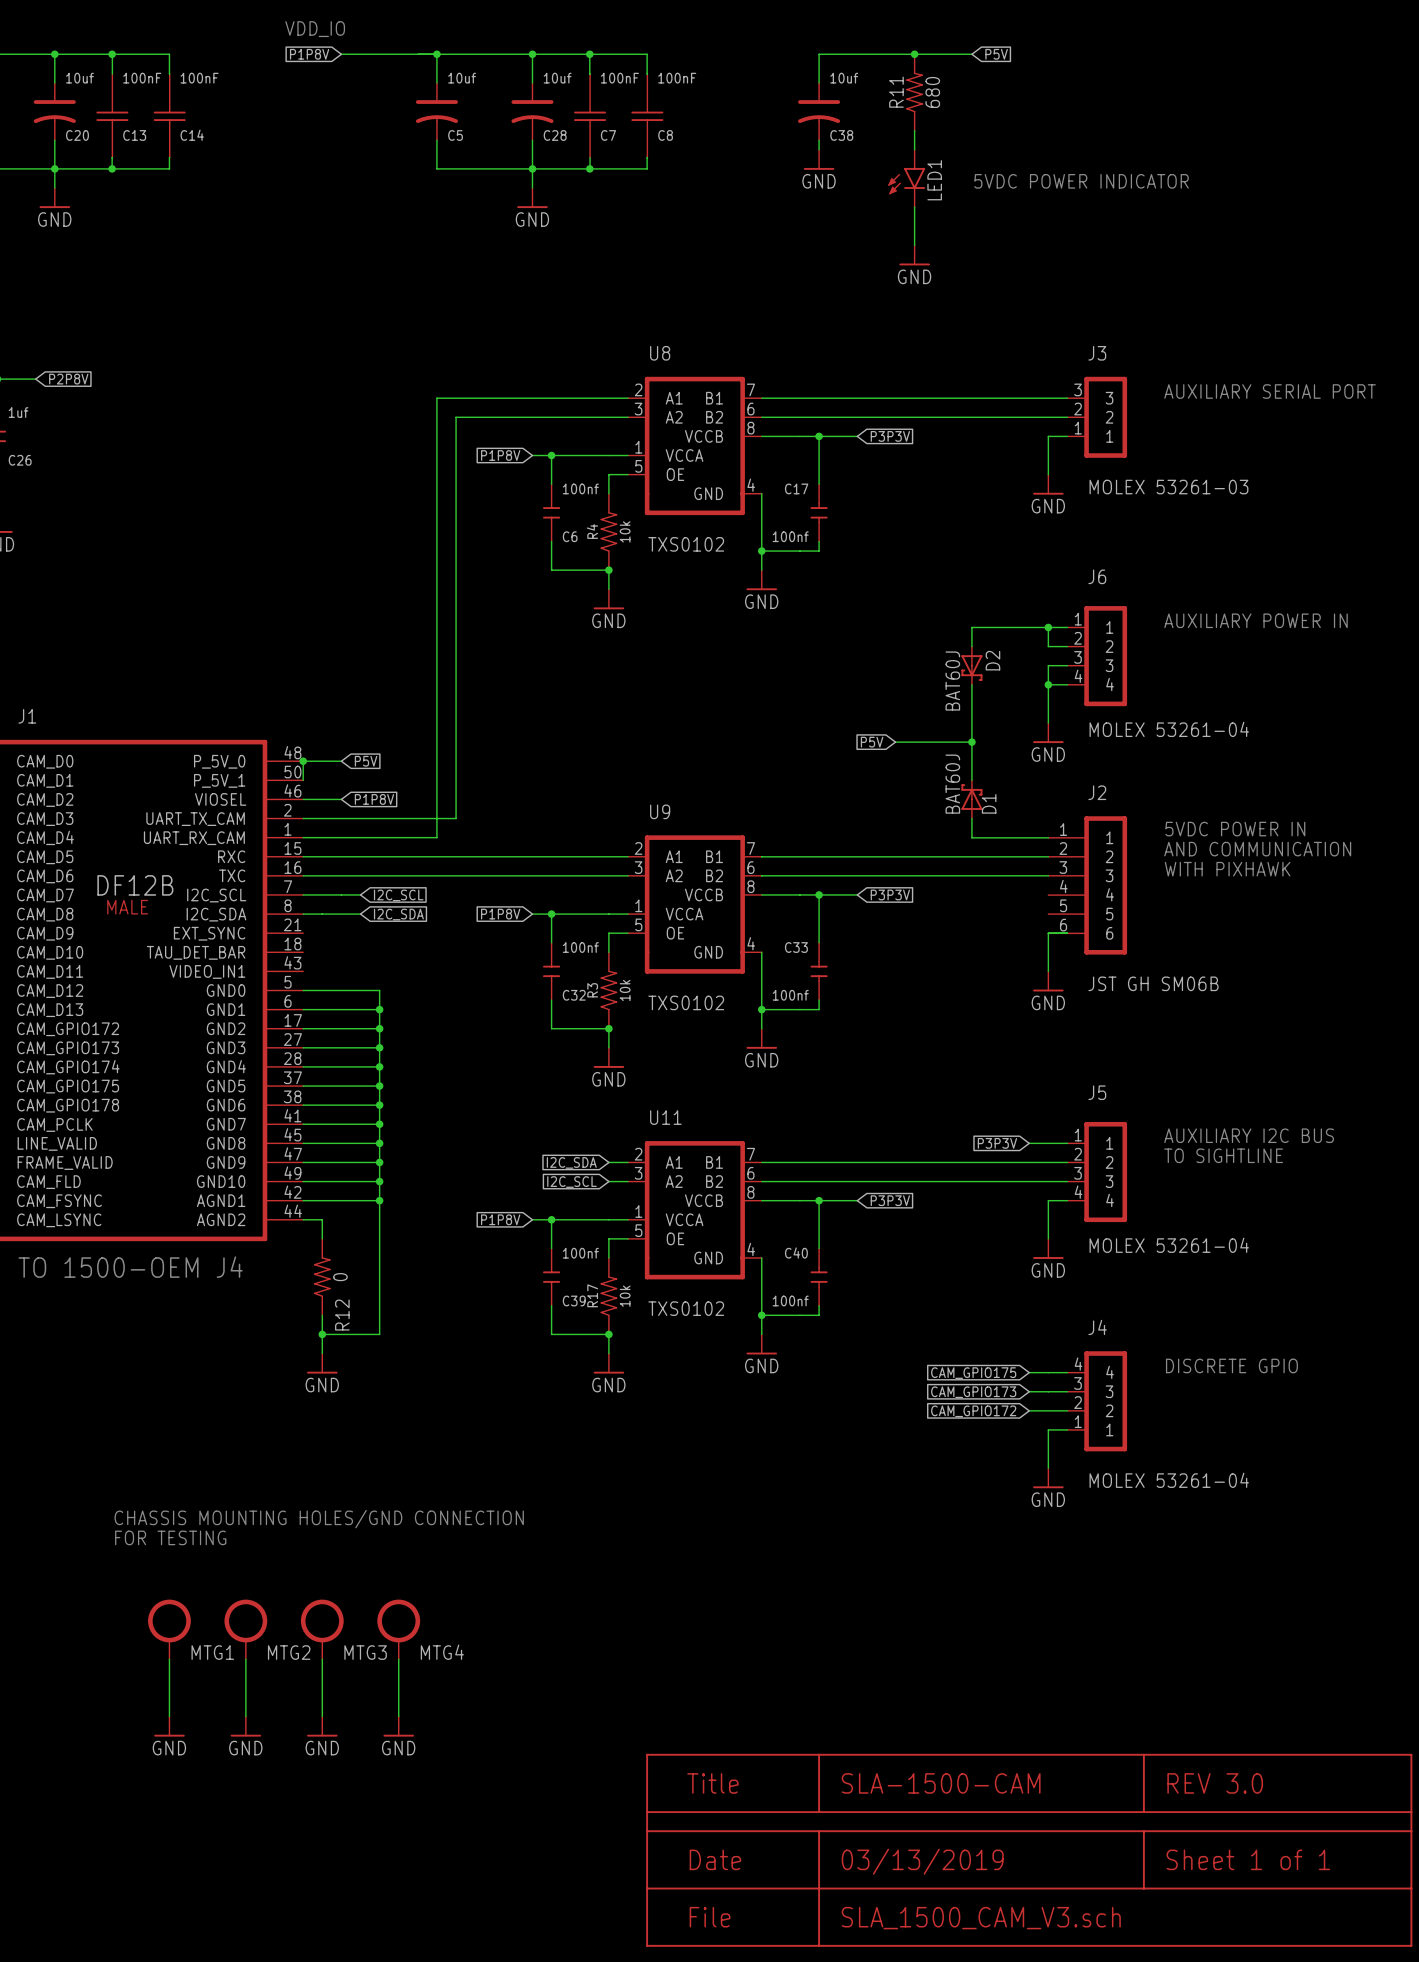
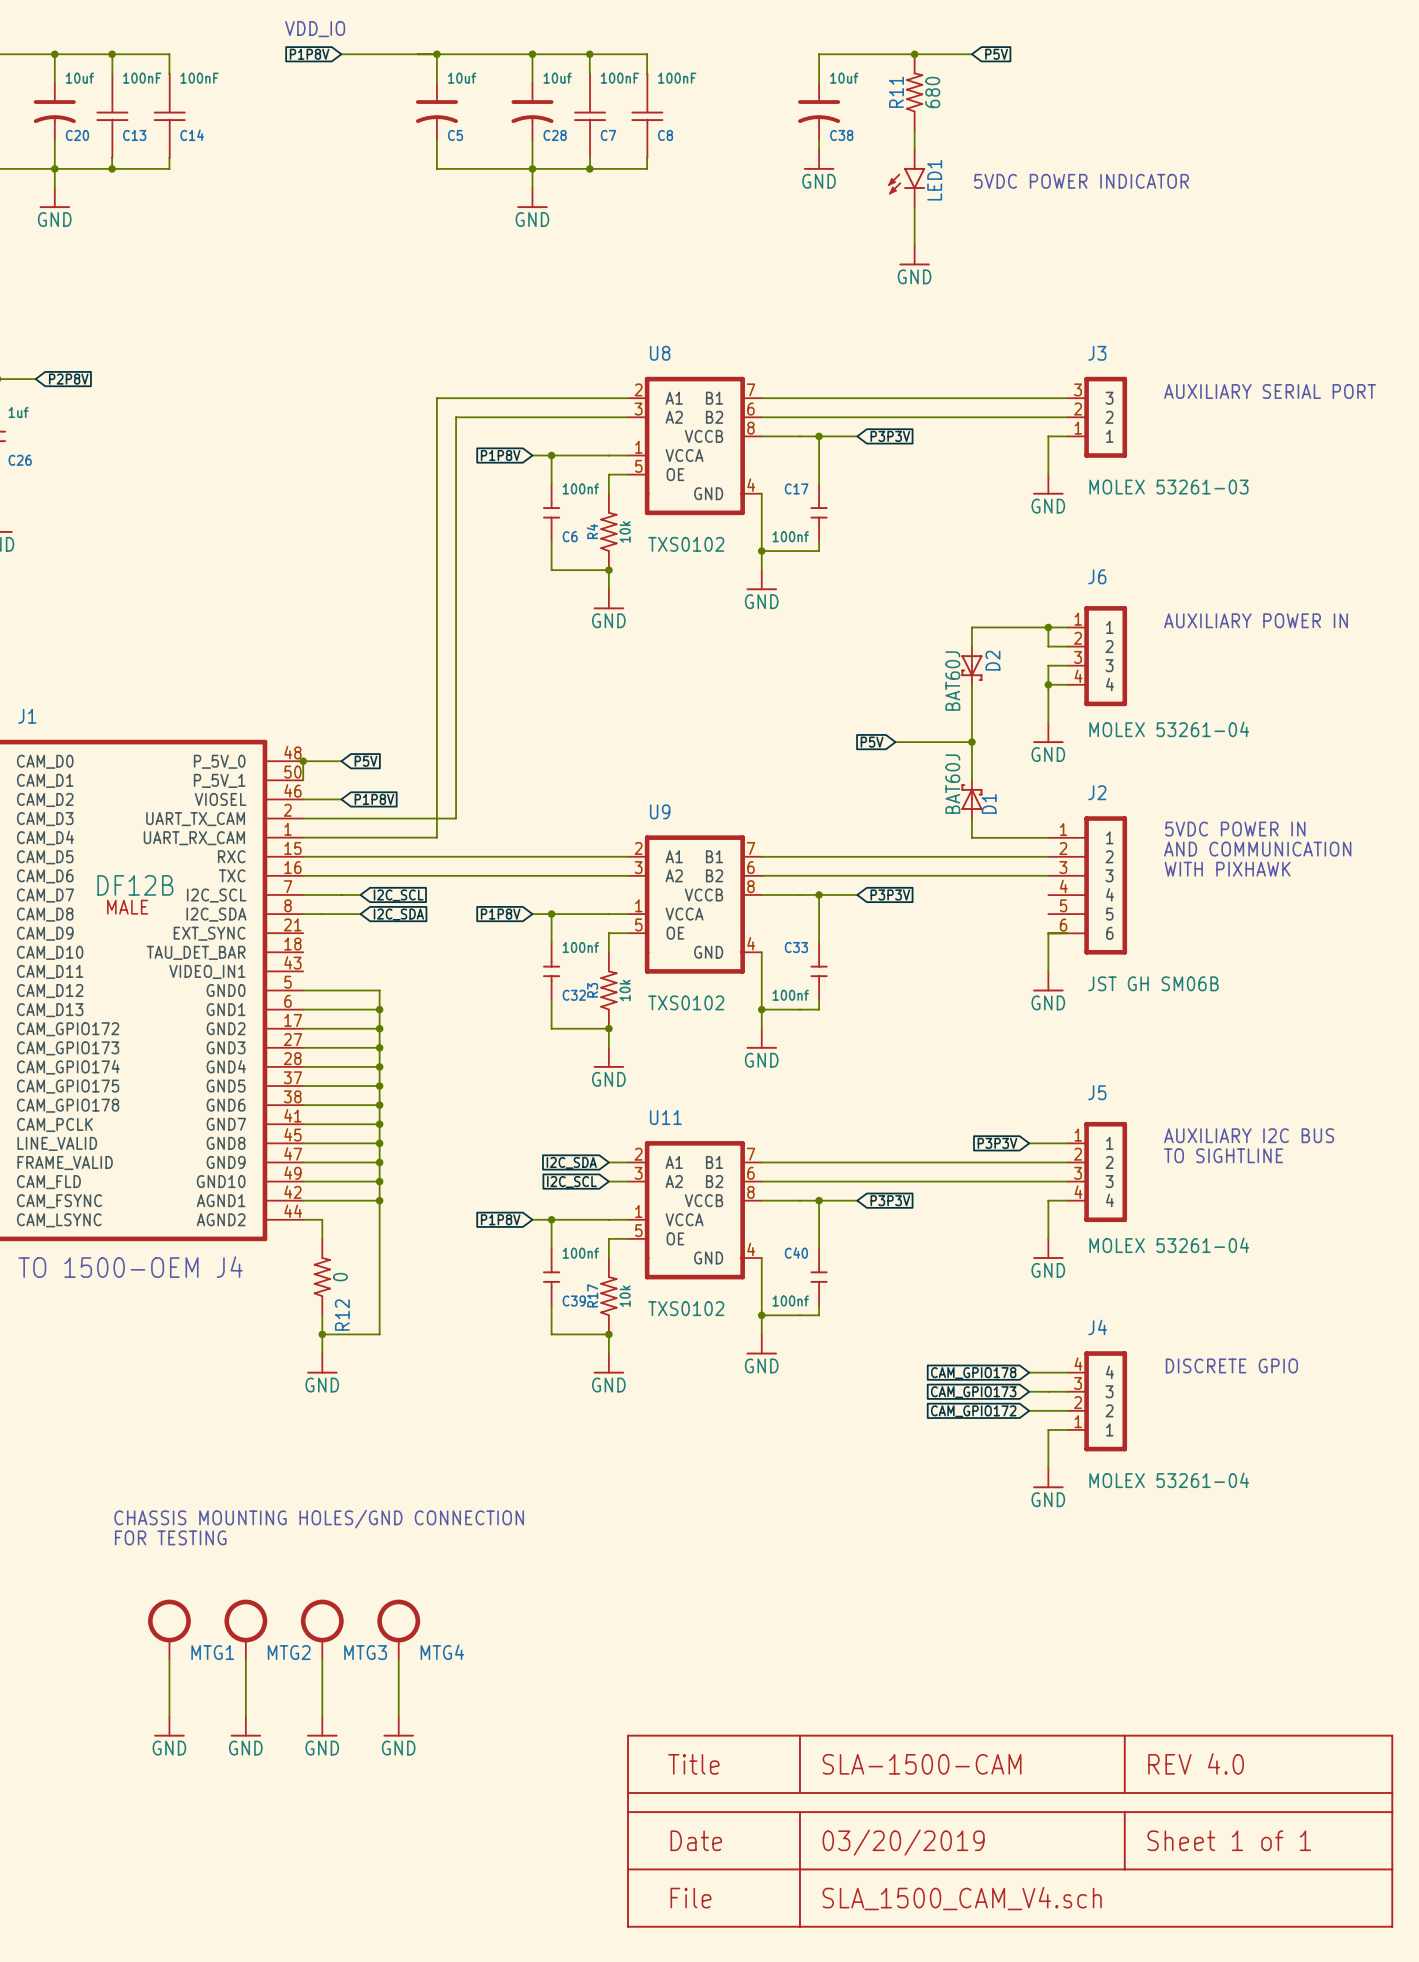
global label: CAM_GPIO175 (973, 1373) -> CAM_GPIO178 (973, 1373)
part: none -> (1010, 1831)
part: (1029, 1850) -> none

